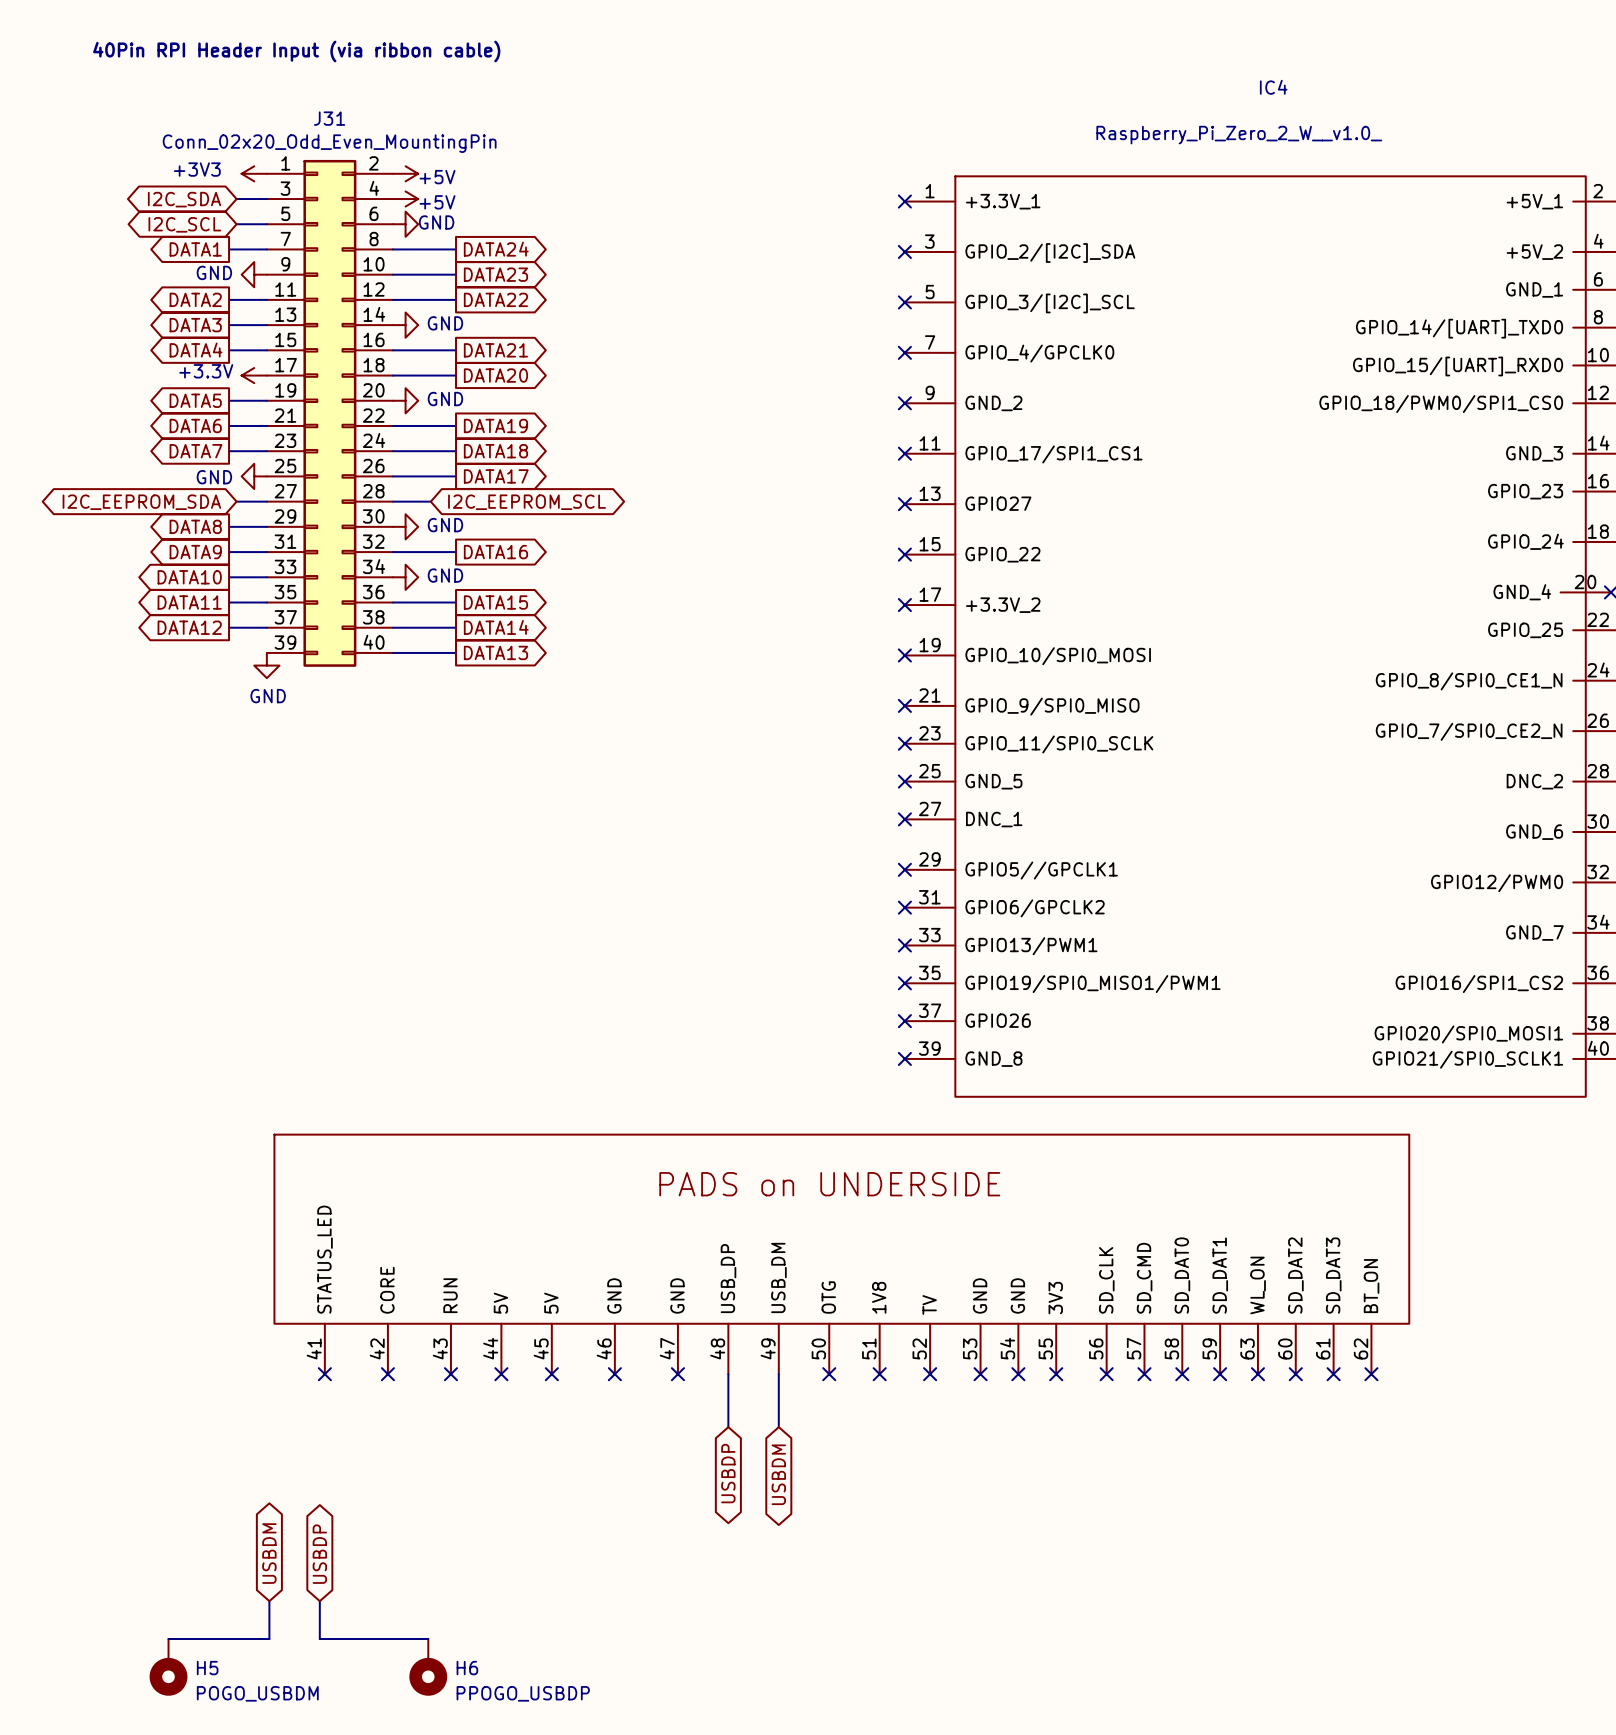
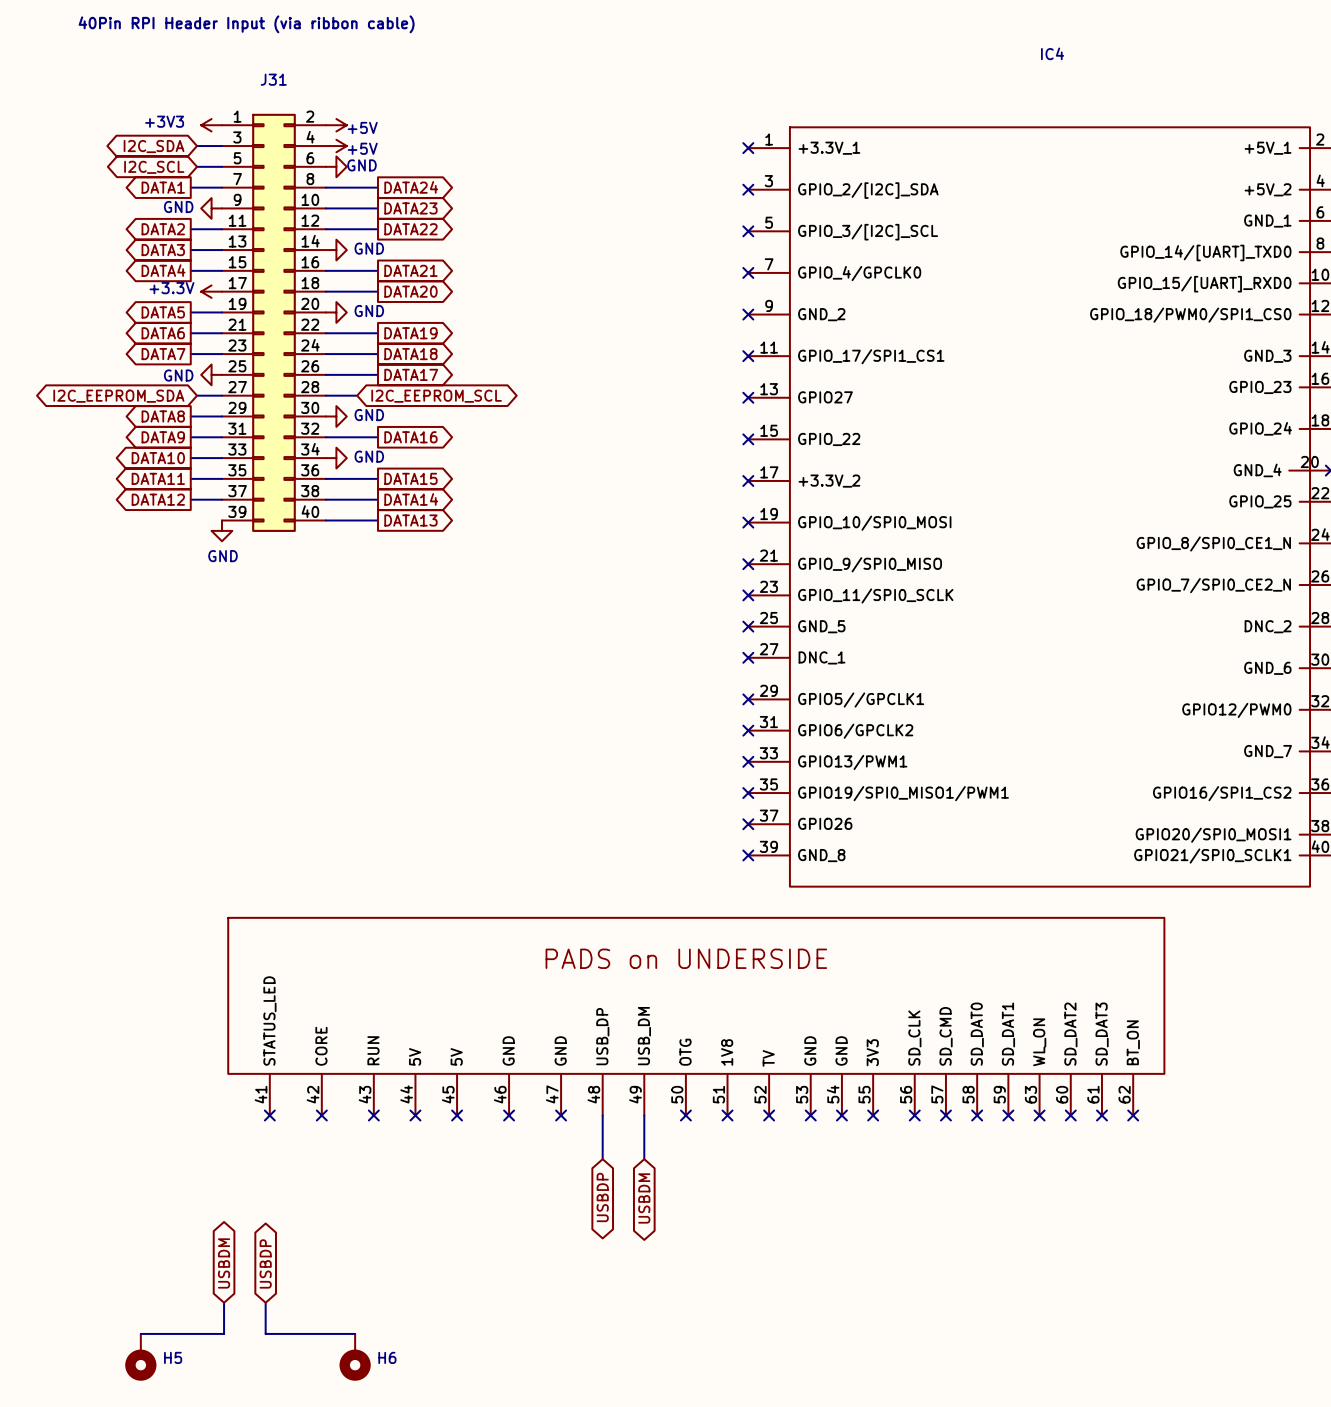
IC4 value: Raspberry_Pi_Zero_2_W__v1.0_ (1239, 135) -> none
J31 value: Conn_02x20_Odd_Even_MountingPin (329, 143) -> none
H5 value: POGO_USBDM (257, 1693) -> none
H6 value: PPOGO_USBDP (523, 1693) -> none

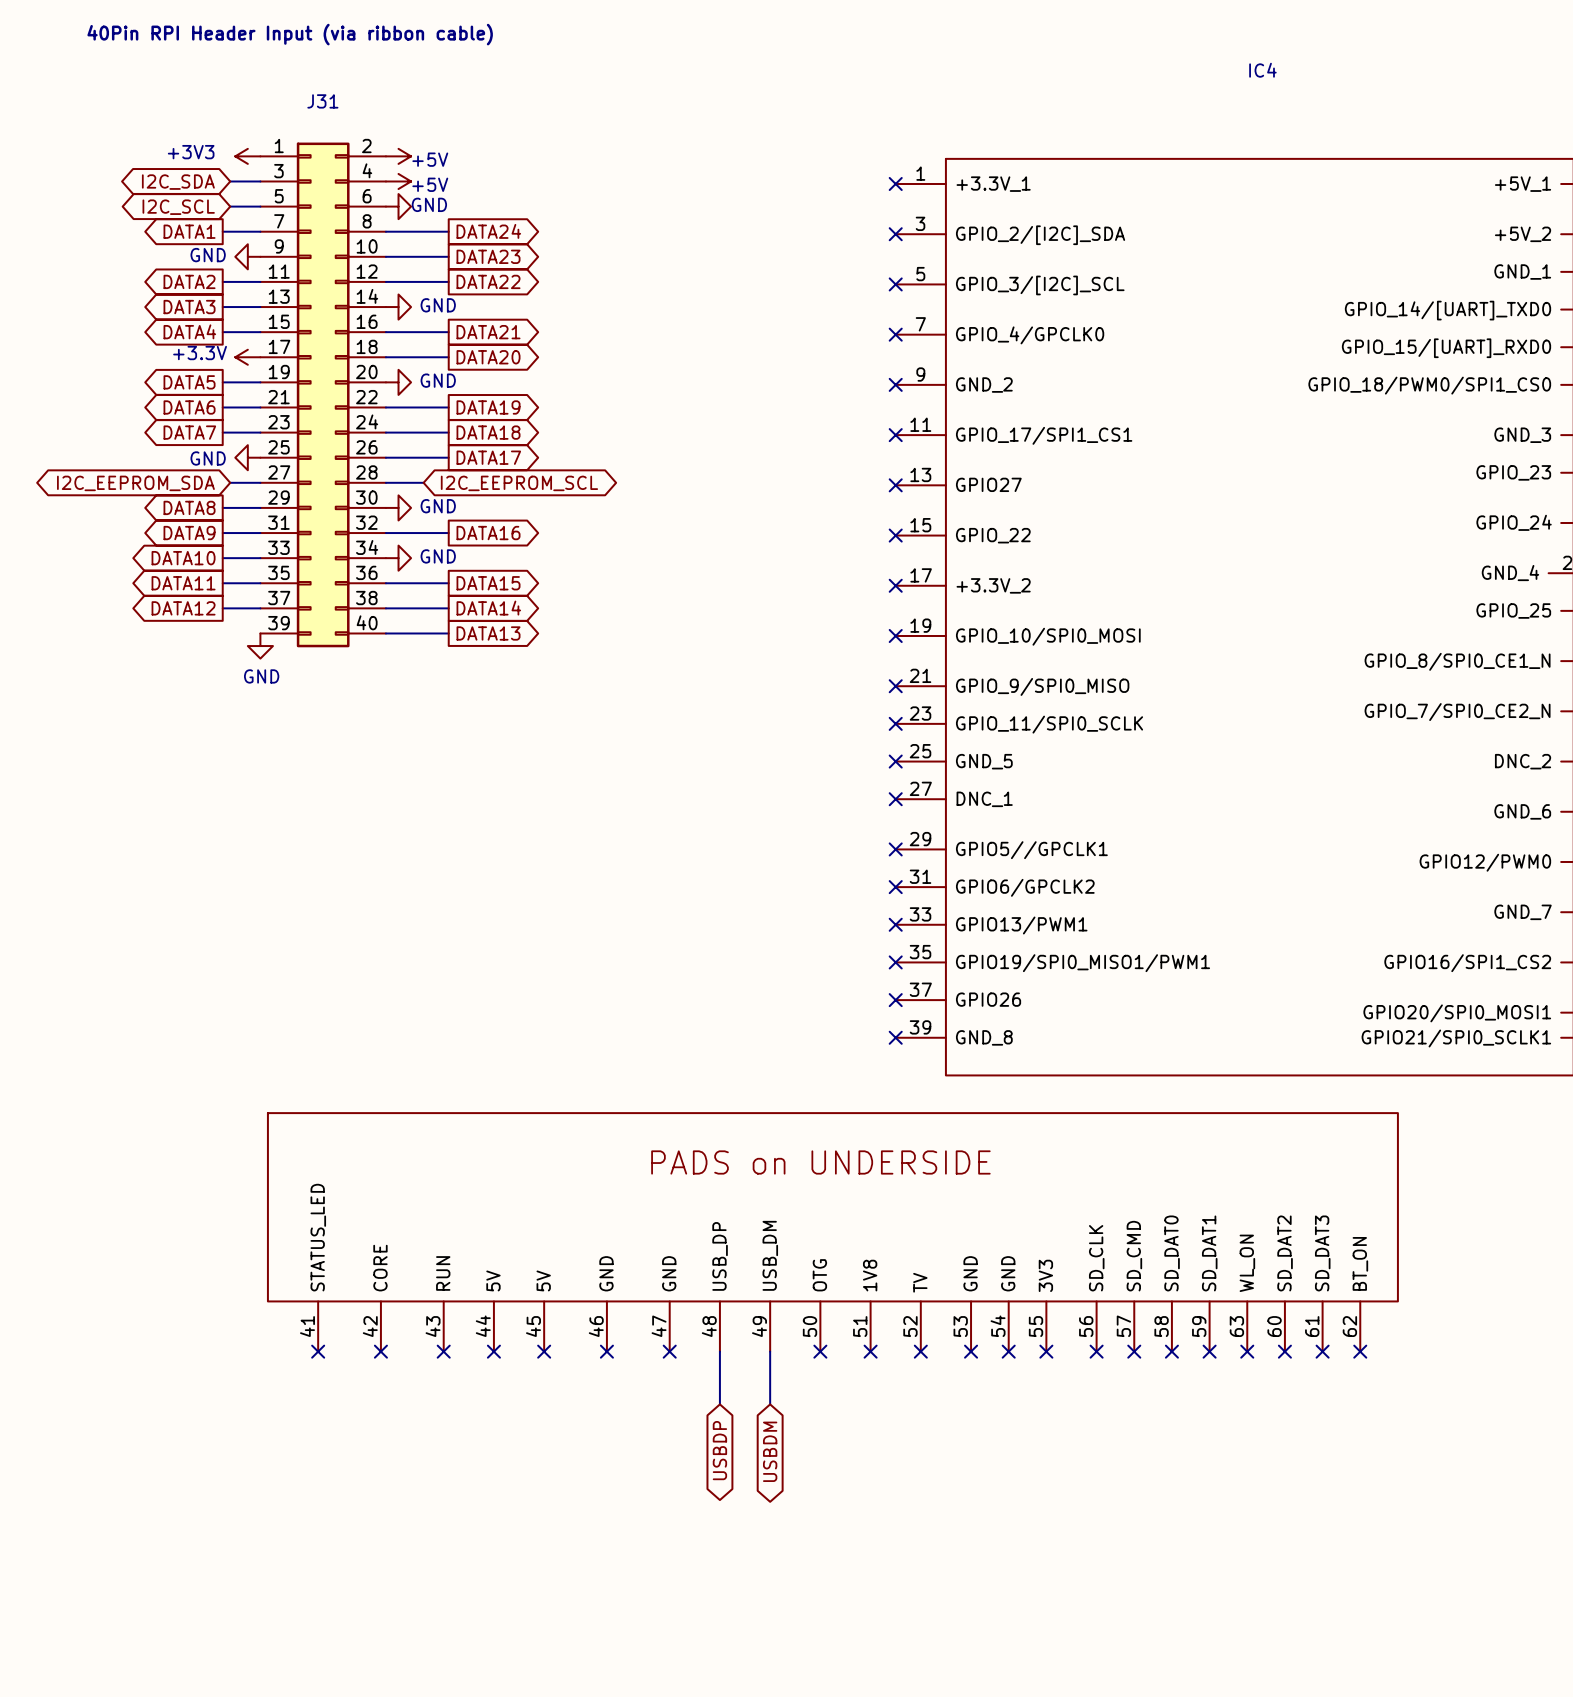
global label: USBDM (224, 1263) -> none
global label: USBDP (265, 1263) -> none
wire: (224, 1302) (224, 1333) (140, 1333) -> none
wire: (265, 1302) (265, 1333) (355, 1333) -> none
H5: (140, 1357) -> none
H6: (355, 1357) -> none

